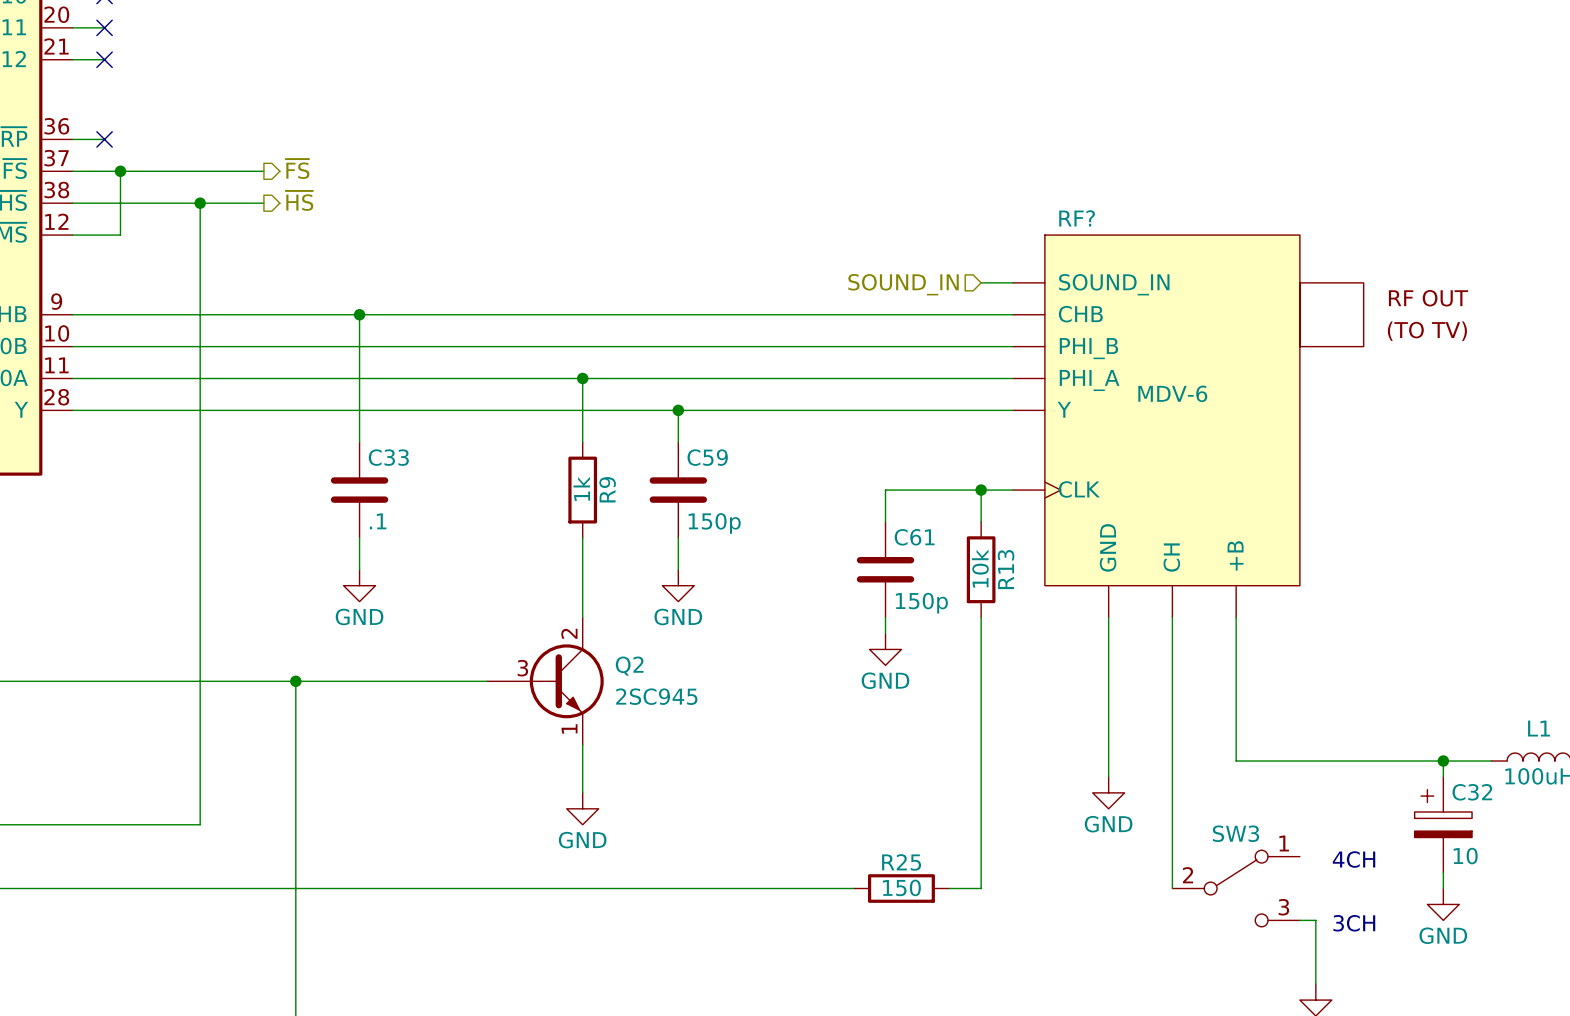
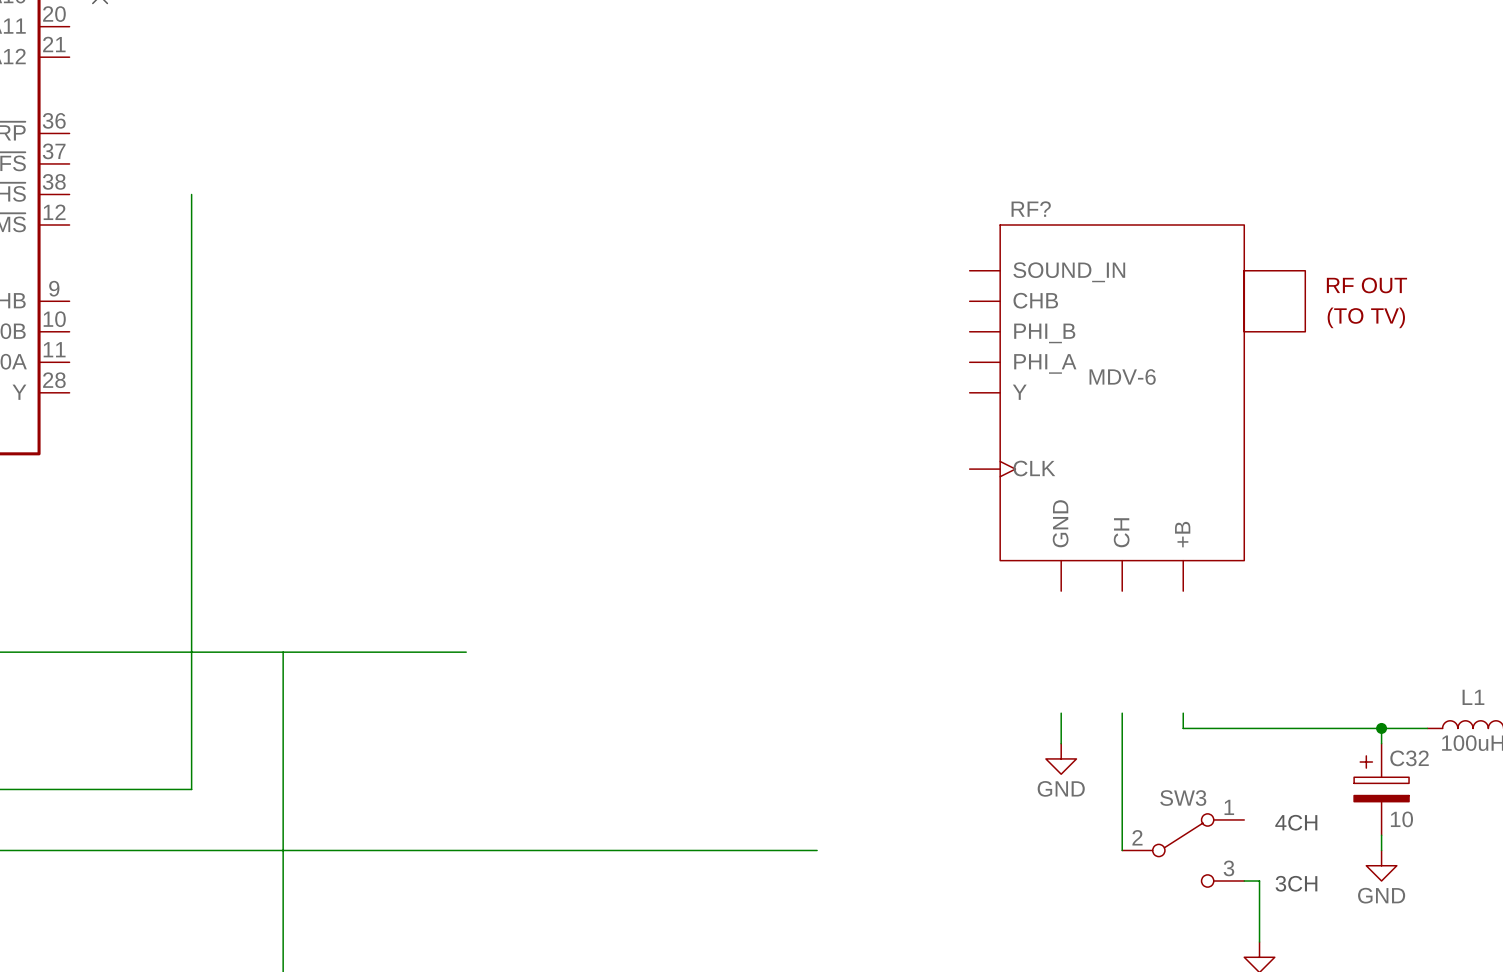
wire: (72, 27) (104, 27) -> none
no-connect mark: (104, 27) -> none
wire: (72, 59) (104, 59) -> none
no-connect mark: (104, 59) -> none
wire: (72, 139) (104, 139) -> none
no-connect mark: (104, 139) -> none
hierarchical label: ~{FS} (297, 169) -> none
wire: (72, 171) (263, 171) -> none
wire: (120, 171) (120, 235) (72, 235) -> none
junction: (120, 171) -> none
hierarchical label: ~{HS} (299, 200) -> none
wire: (72, 203) (263, 203) -> none
junction: (200, 203) -> none
wire: (981, 282) (1013, 282) -> none
hierarchical label: SOUND_IN (903, 284) -> none
wire: (72, 314) (1013, 314) -> none
wire: (359, 314) (359, 442) -> none
junction: (359, 314) -> none
wire: (72, 346) (1013, 346) -> none
wire: (72, 378) (1013, 378) -> none
wire: (582, 378) (582, 442) -> none
junction: (582, 378) -> none
wire: (72, 410) (1013, 410) -> none
wire: (678, 410) (678, 442) -> none
junction: (678, 410) -> none
C33: .1 (359, 490) -> none
R9: 1k (582, 490) -> none
C59: 150p (678, 490) -> none
wire: (981, 490) (981, 521) -> none
junction: (981, 490) -> none
wire: (1013, 490) (885, 490) (885, 521) -> none
wire: (359, 537) (359, 569) -> none
wire: (582, 537) (582, 617) -> none
wire: (678, 537) (678, 569) -> none
C61: 150p (885, 569) -> none
R13: 10k (981, 569) -> none
power symbol: GND (359, 585) -> none
power symbol: GND (678, 585) -> none
wire: (885, 617) (885, 633) -> none
wire: (981, 617) (981, 888) (949, 888) -> none
wire: (1108, 617) (1108, 745) -> none
wire: (1172, 617) (1172, 745) -> none
wire: (1236, 617) (1236, 745) -> none
power symbol: GND (885, 649) -> none
junction: (295, 681) -> none
Q2: 2SC945 (545, 681) -> none
wire: (582, 745) (582, 792) -> none
power symbol: GND (582, 808) -> none
R25: 150 (901, 888) -> none

